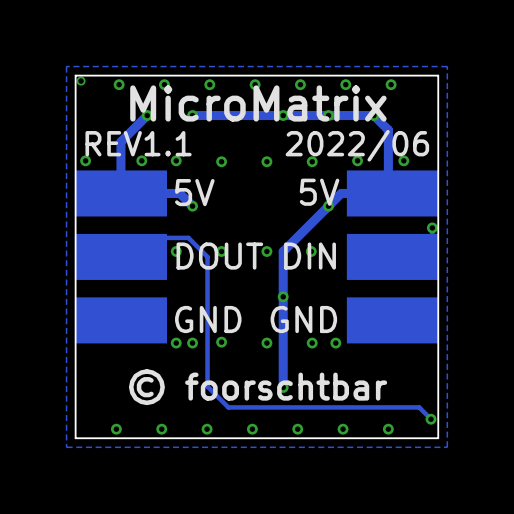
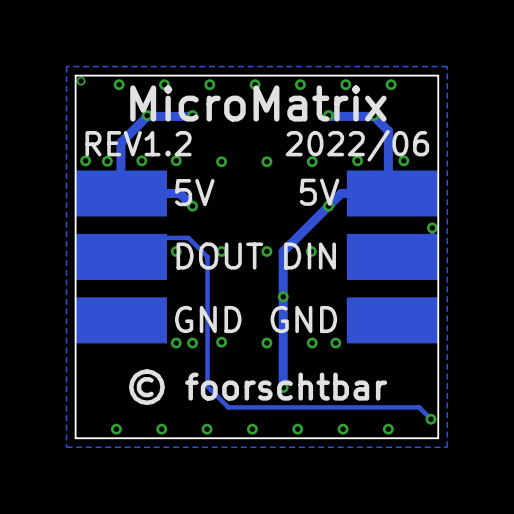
track: (147, 115) (120, 142) -> (192, 116) (147, 116) (120, 142)
track: (192, 115) (373, 115) (388, 130) -> (328, 116) (373, 116) (388, 130)
via: (283, 115) -> none
text: REV1.1 (138, 143) -> REV1.2 (138, 143)
via: none -> (107, 161)

